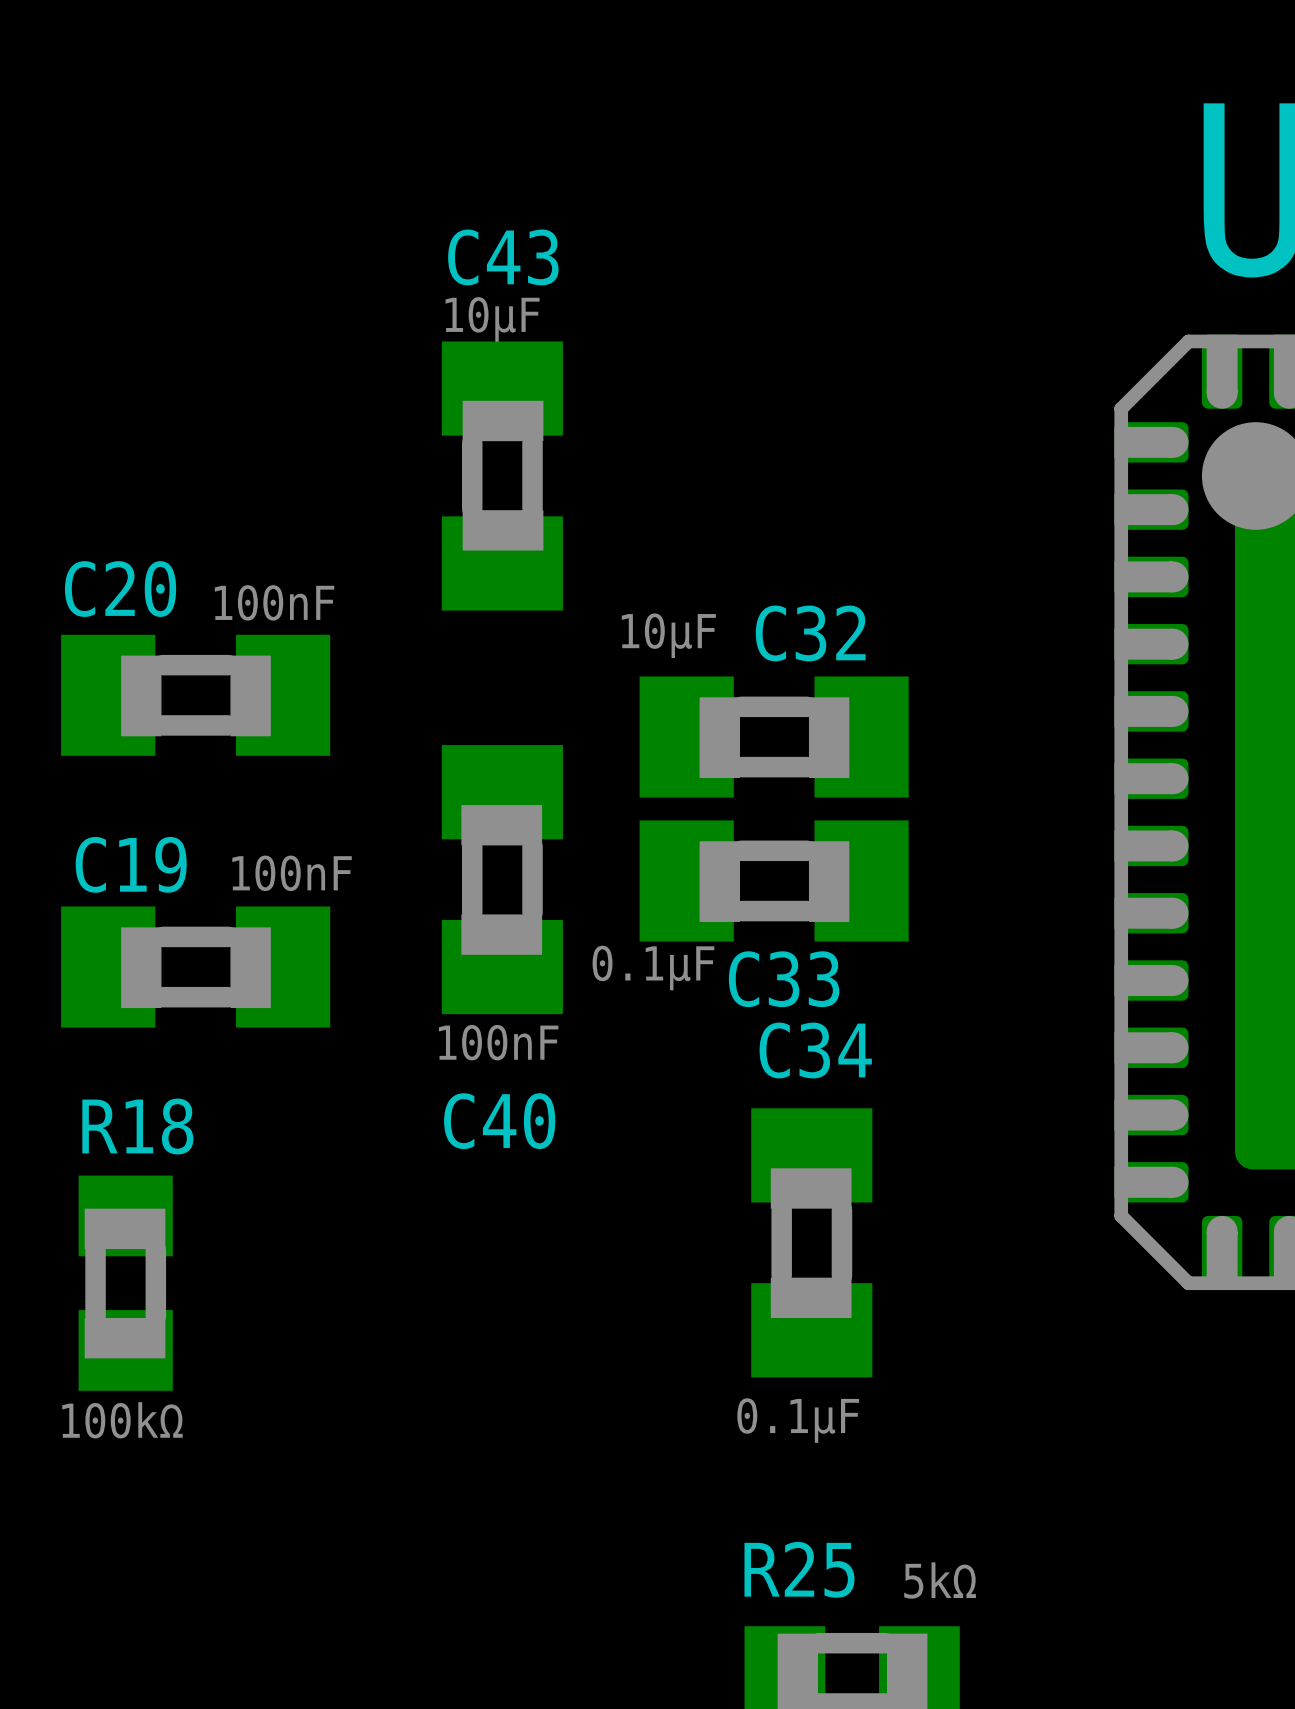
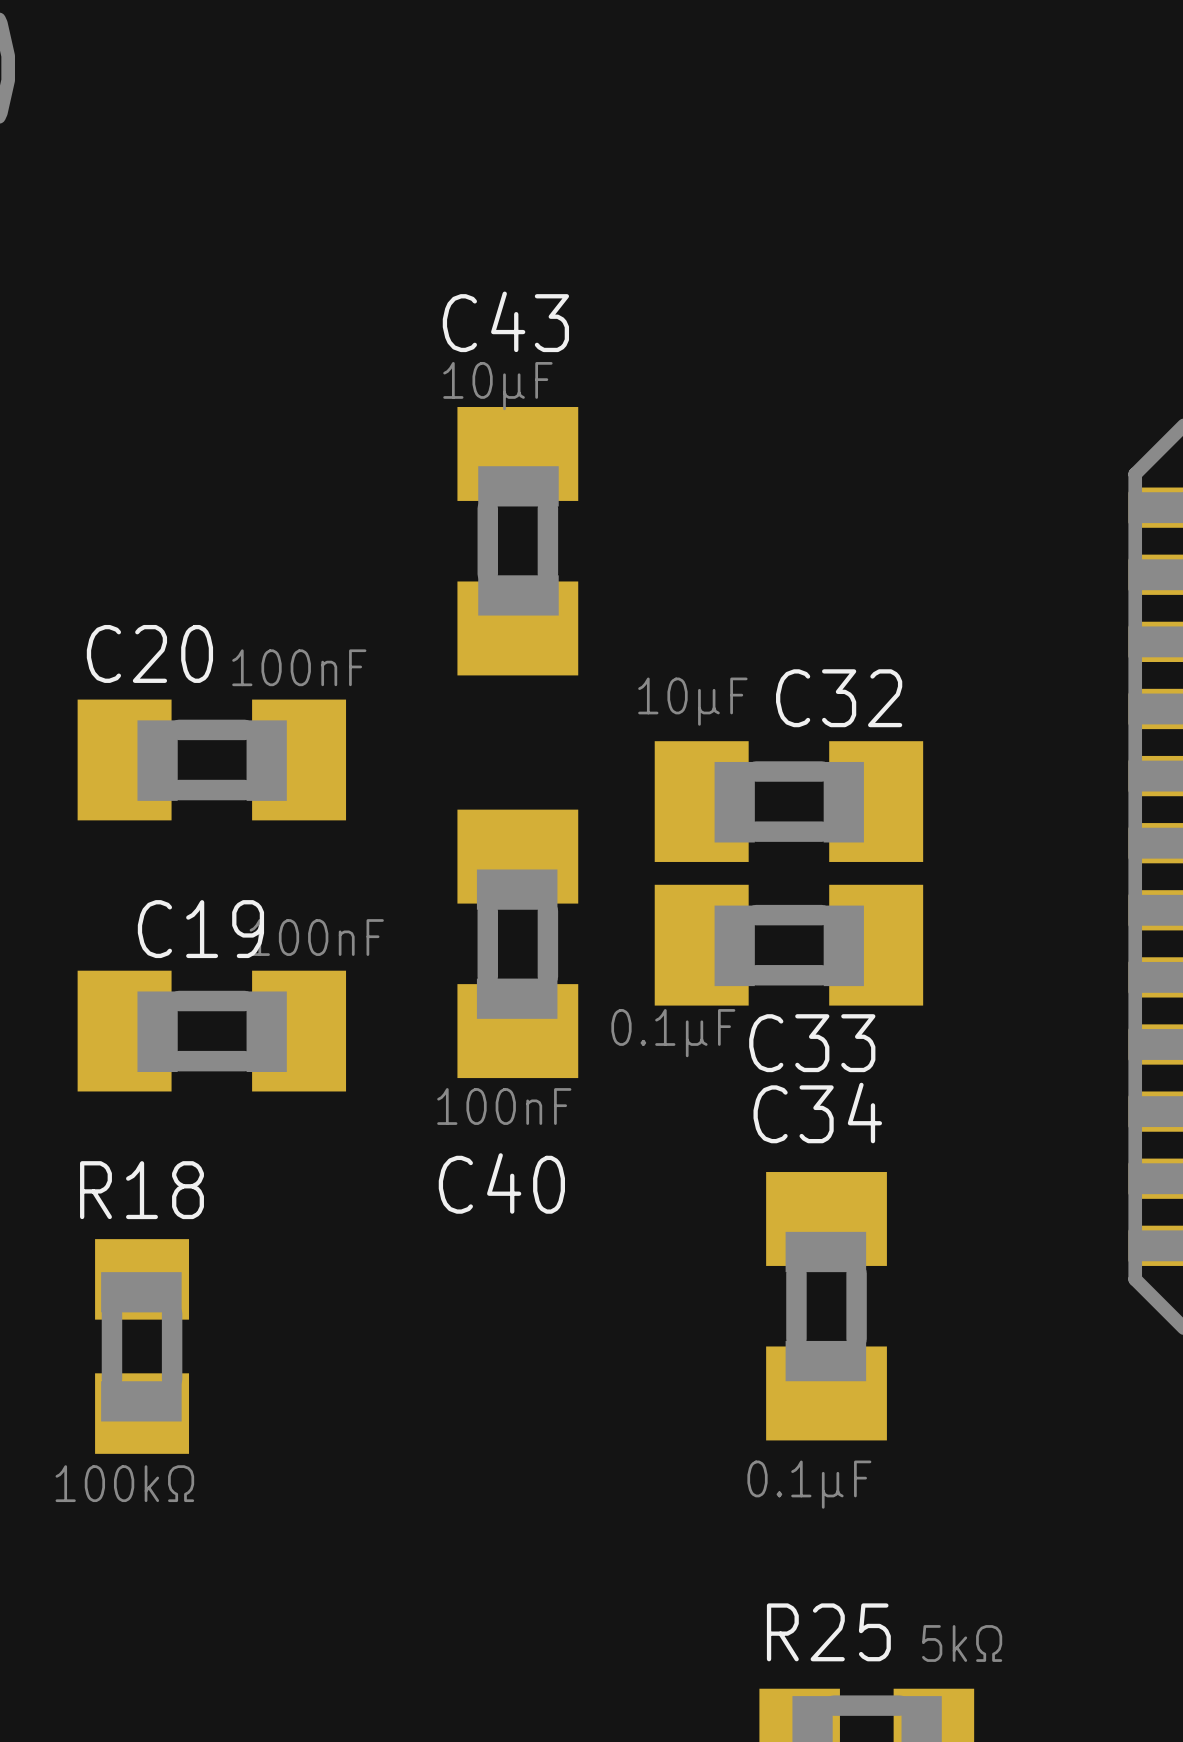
C19 name position: C19 (131, 864) -> C19 (200, 929)

